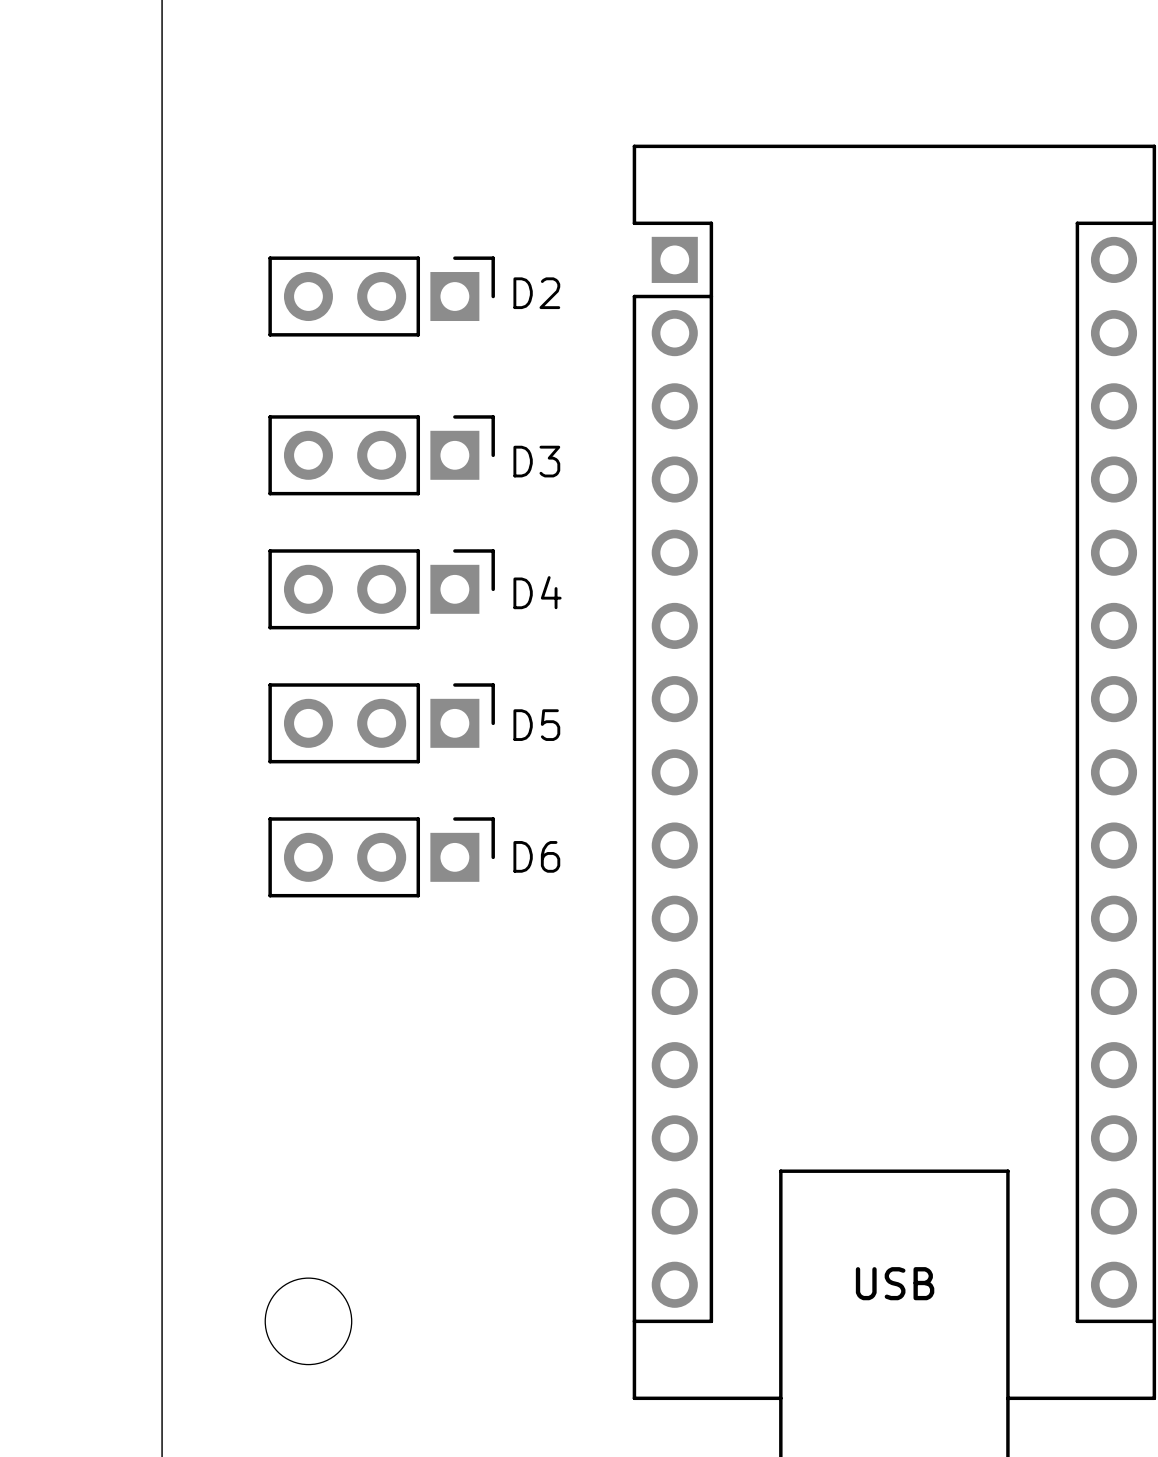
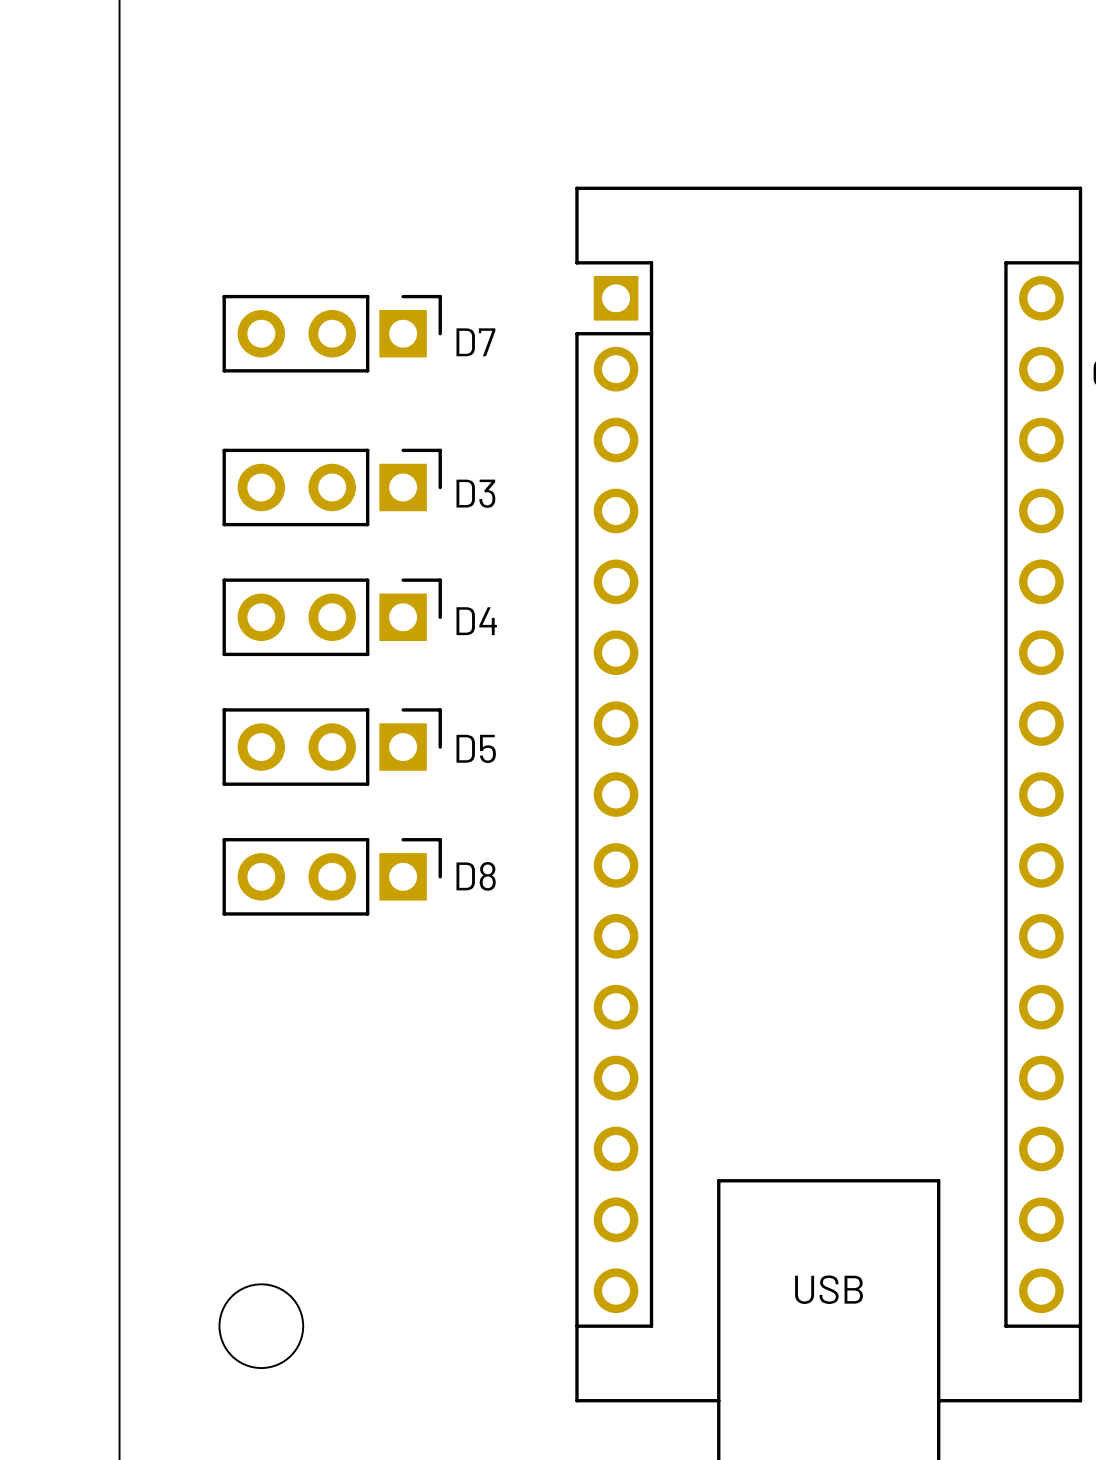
text: D2 (536, 293) -> D7 (475, 342)
text: D6 (536, 856) -> D8 (476, 876)

